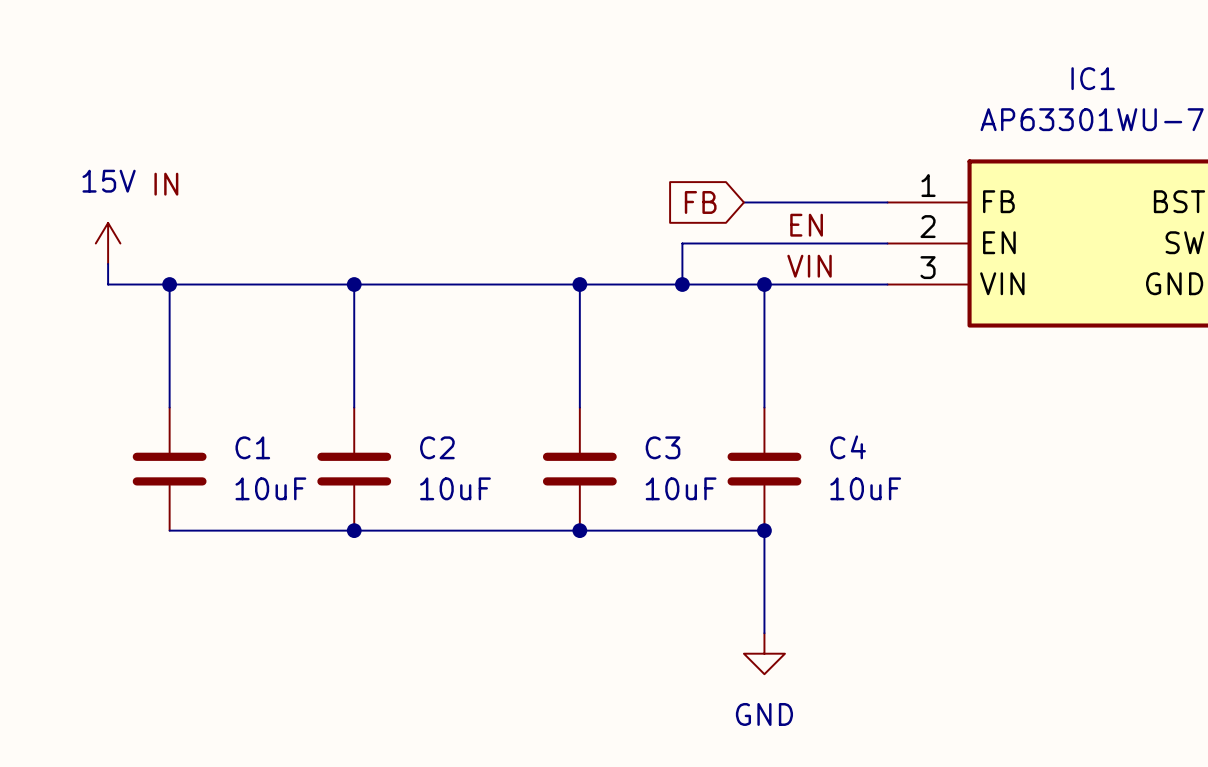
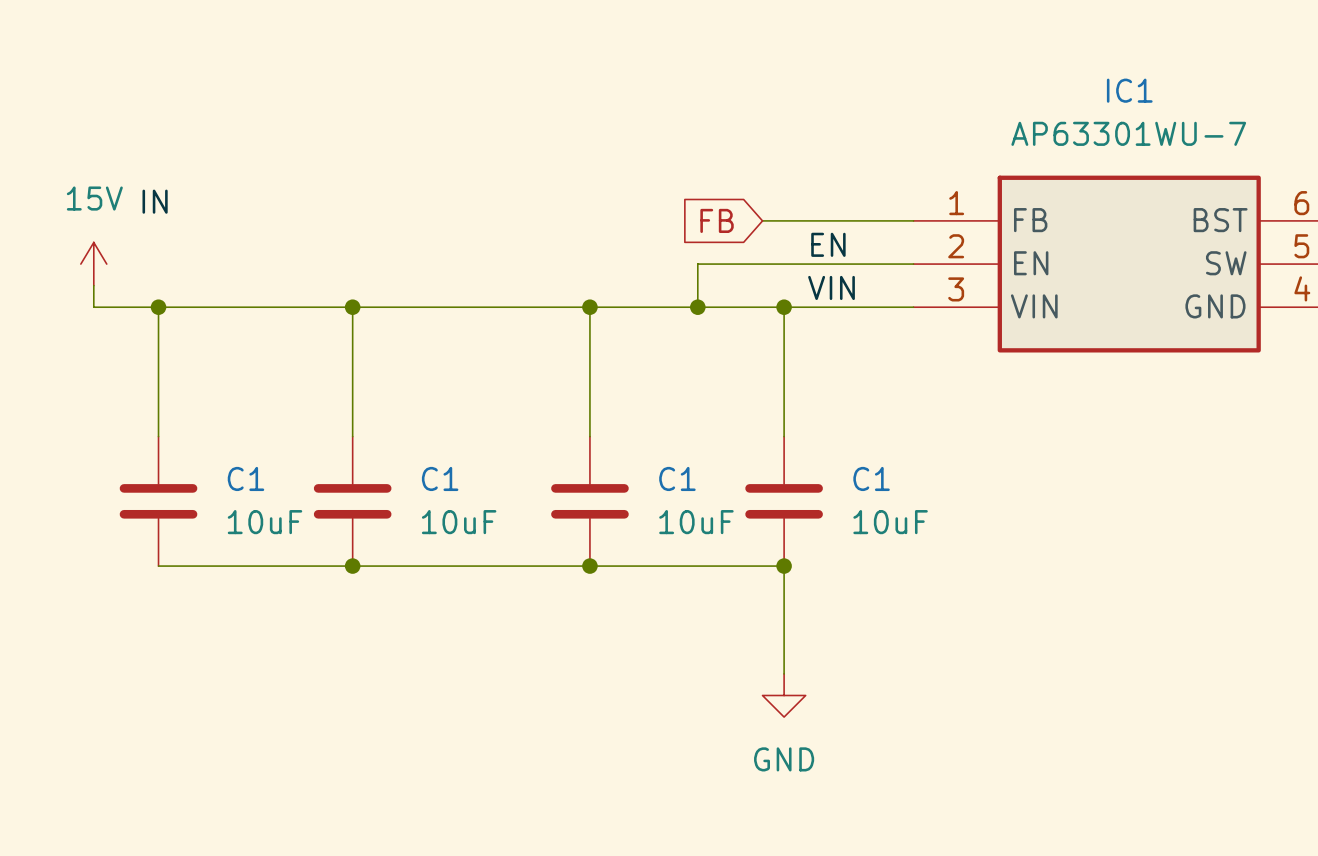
C2 name: C2 (437, 447) -> C1 (440, 478)
C3 name: C3 (663, 447) -> C1 (677, 478)
C4 name: C4 (848, 447) -> C1 (871, 478)

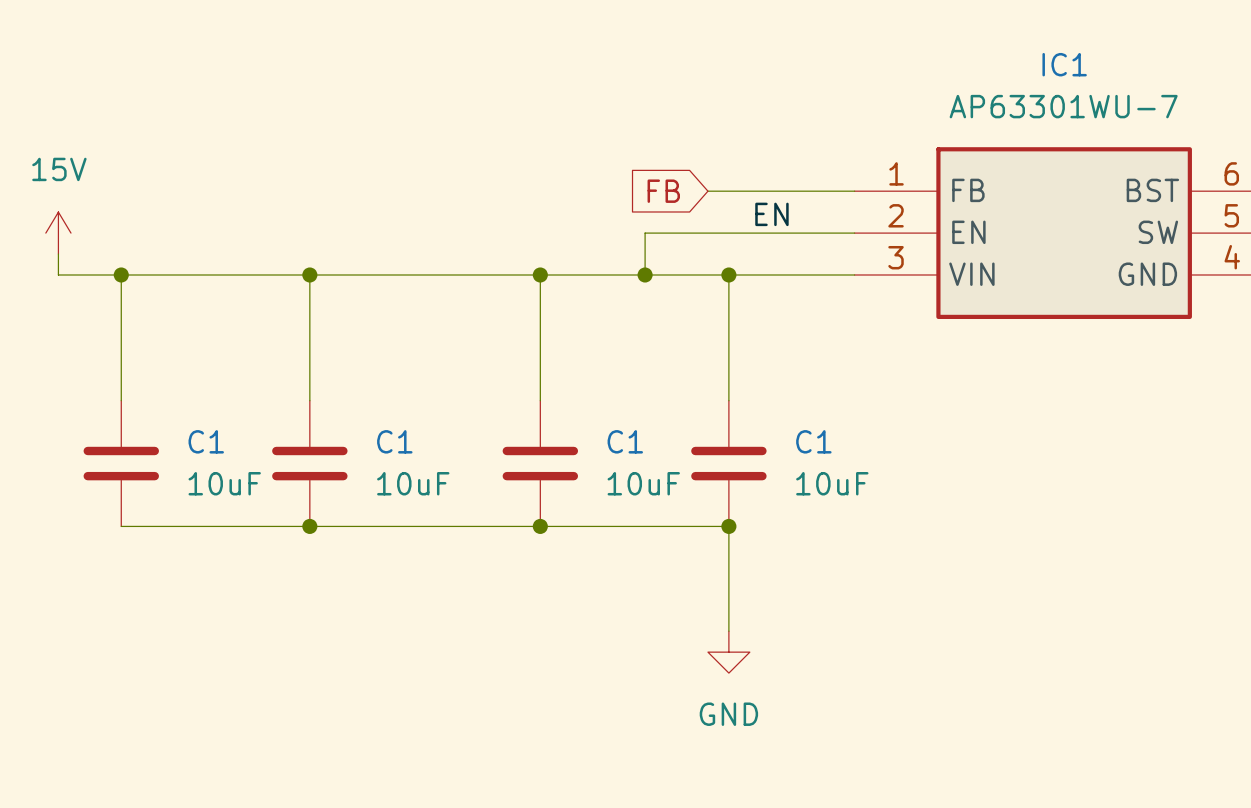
label: IN (155, 201) -> none
label: VIN (831, 287) -> none

